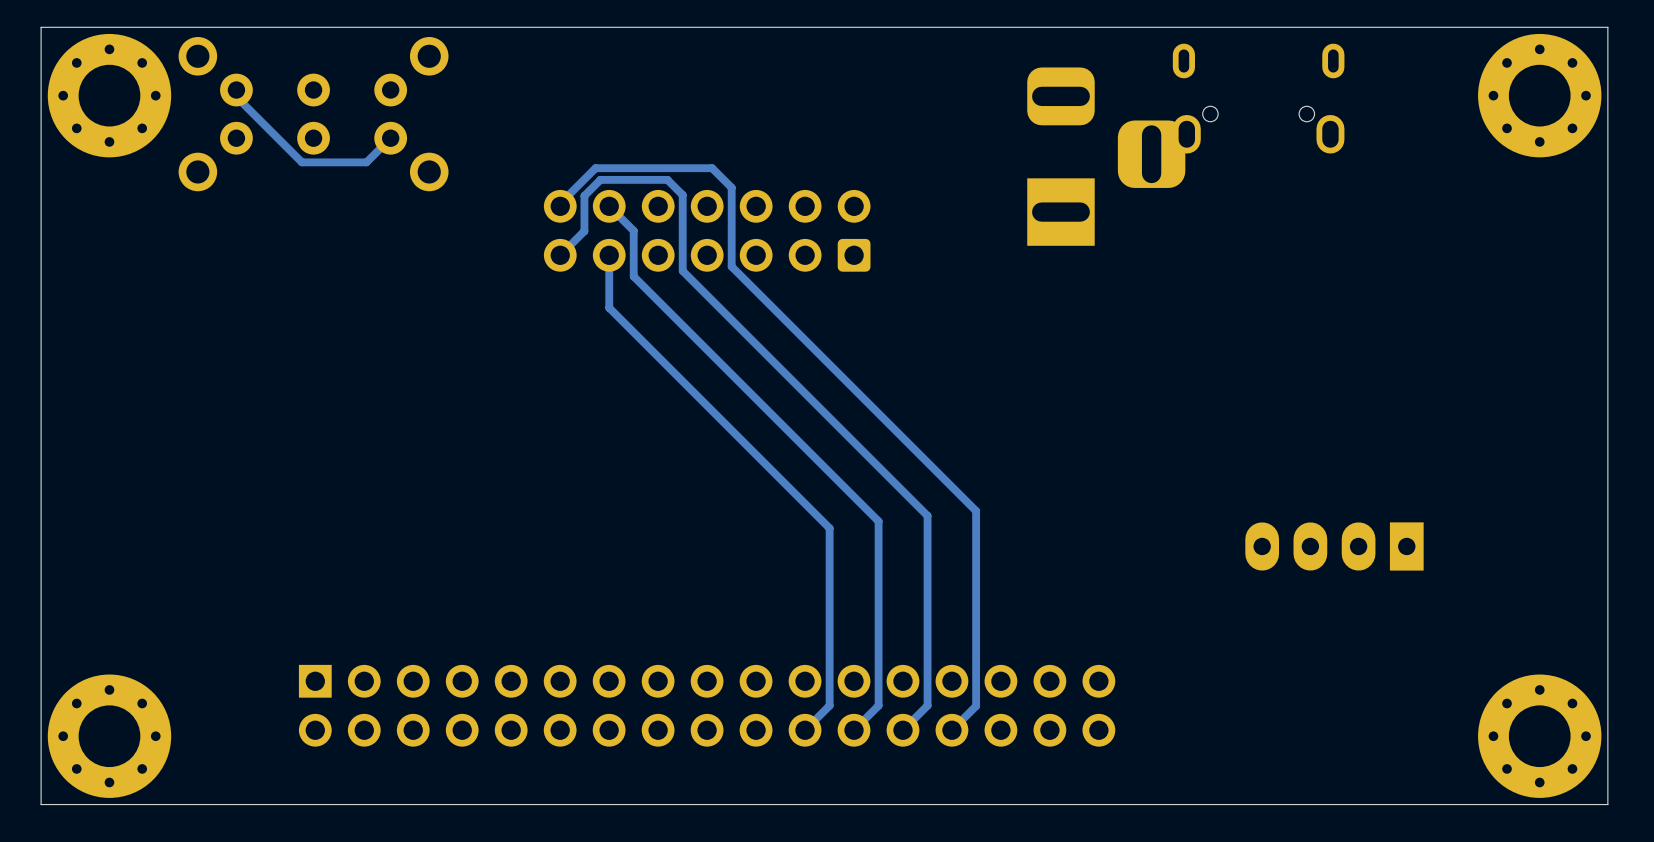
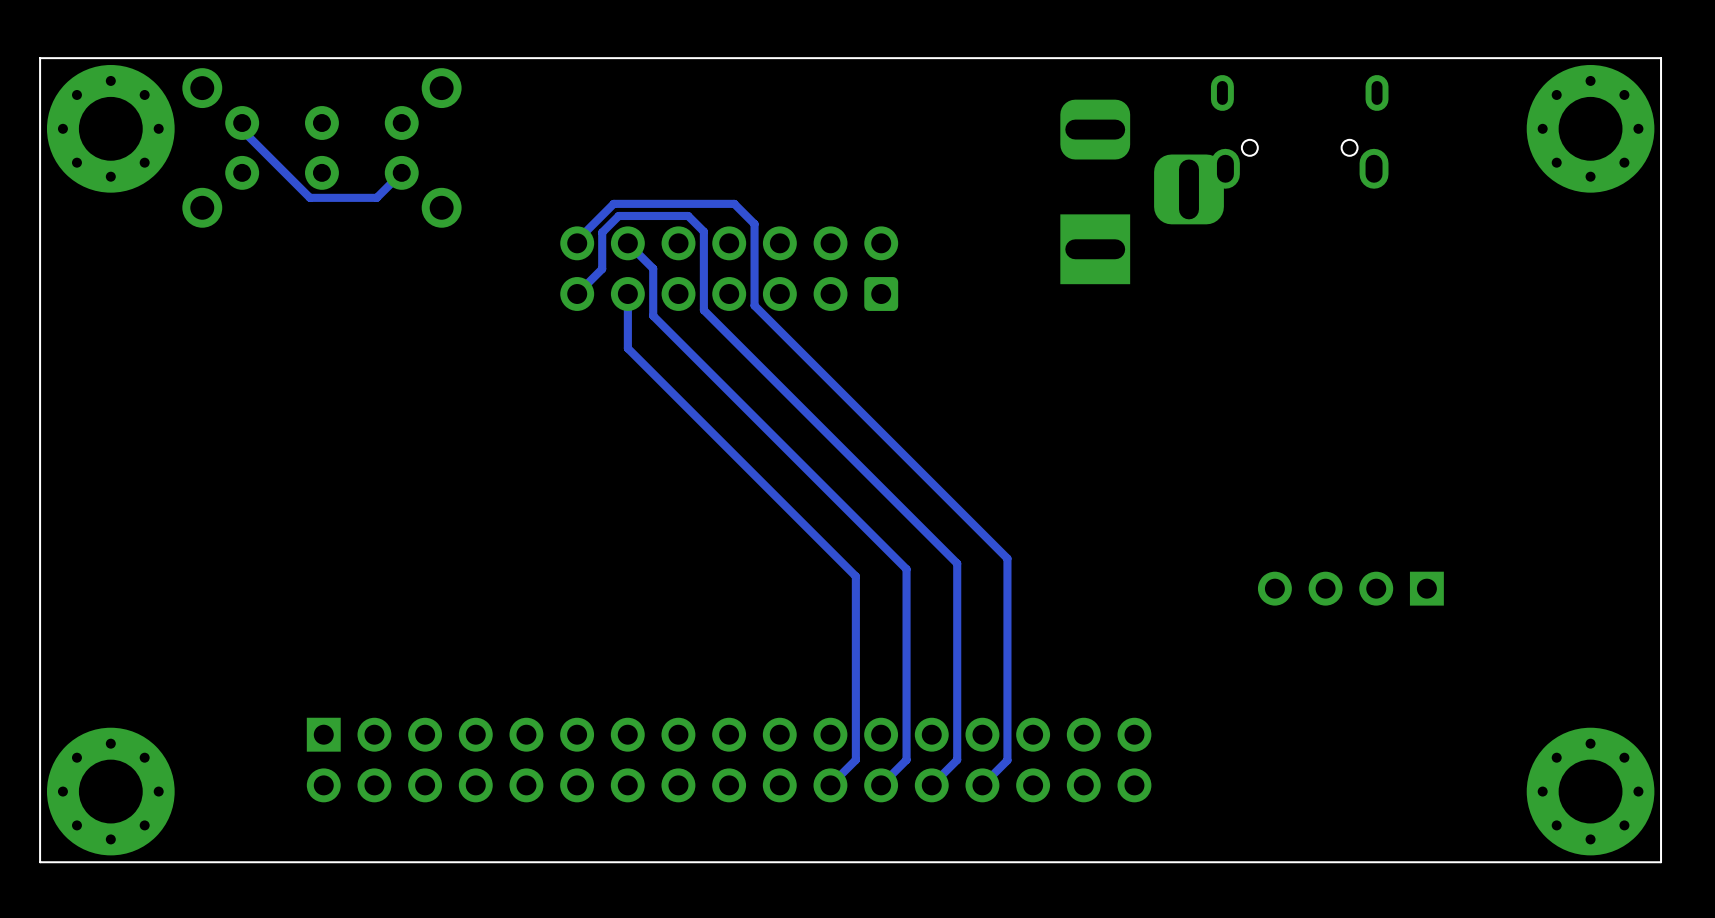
part: none -> (1350, 588)
part: (1334, 546) -> none

